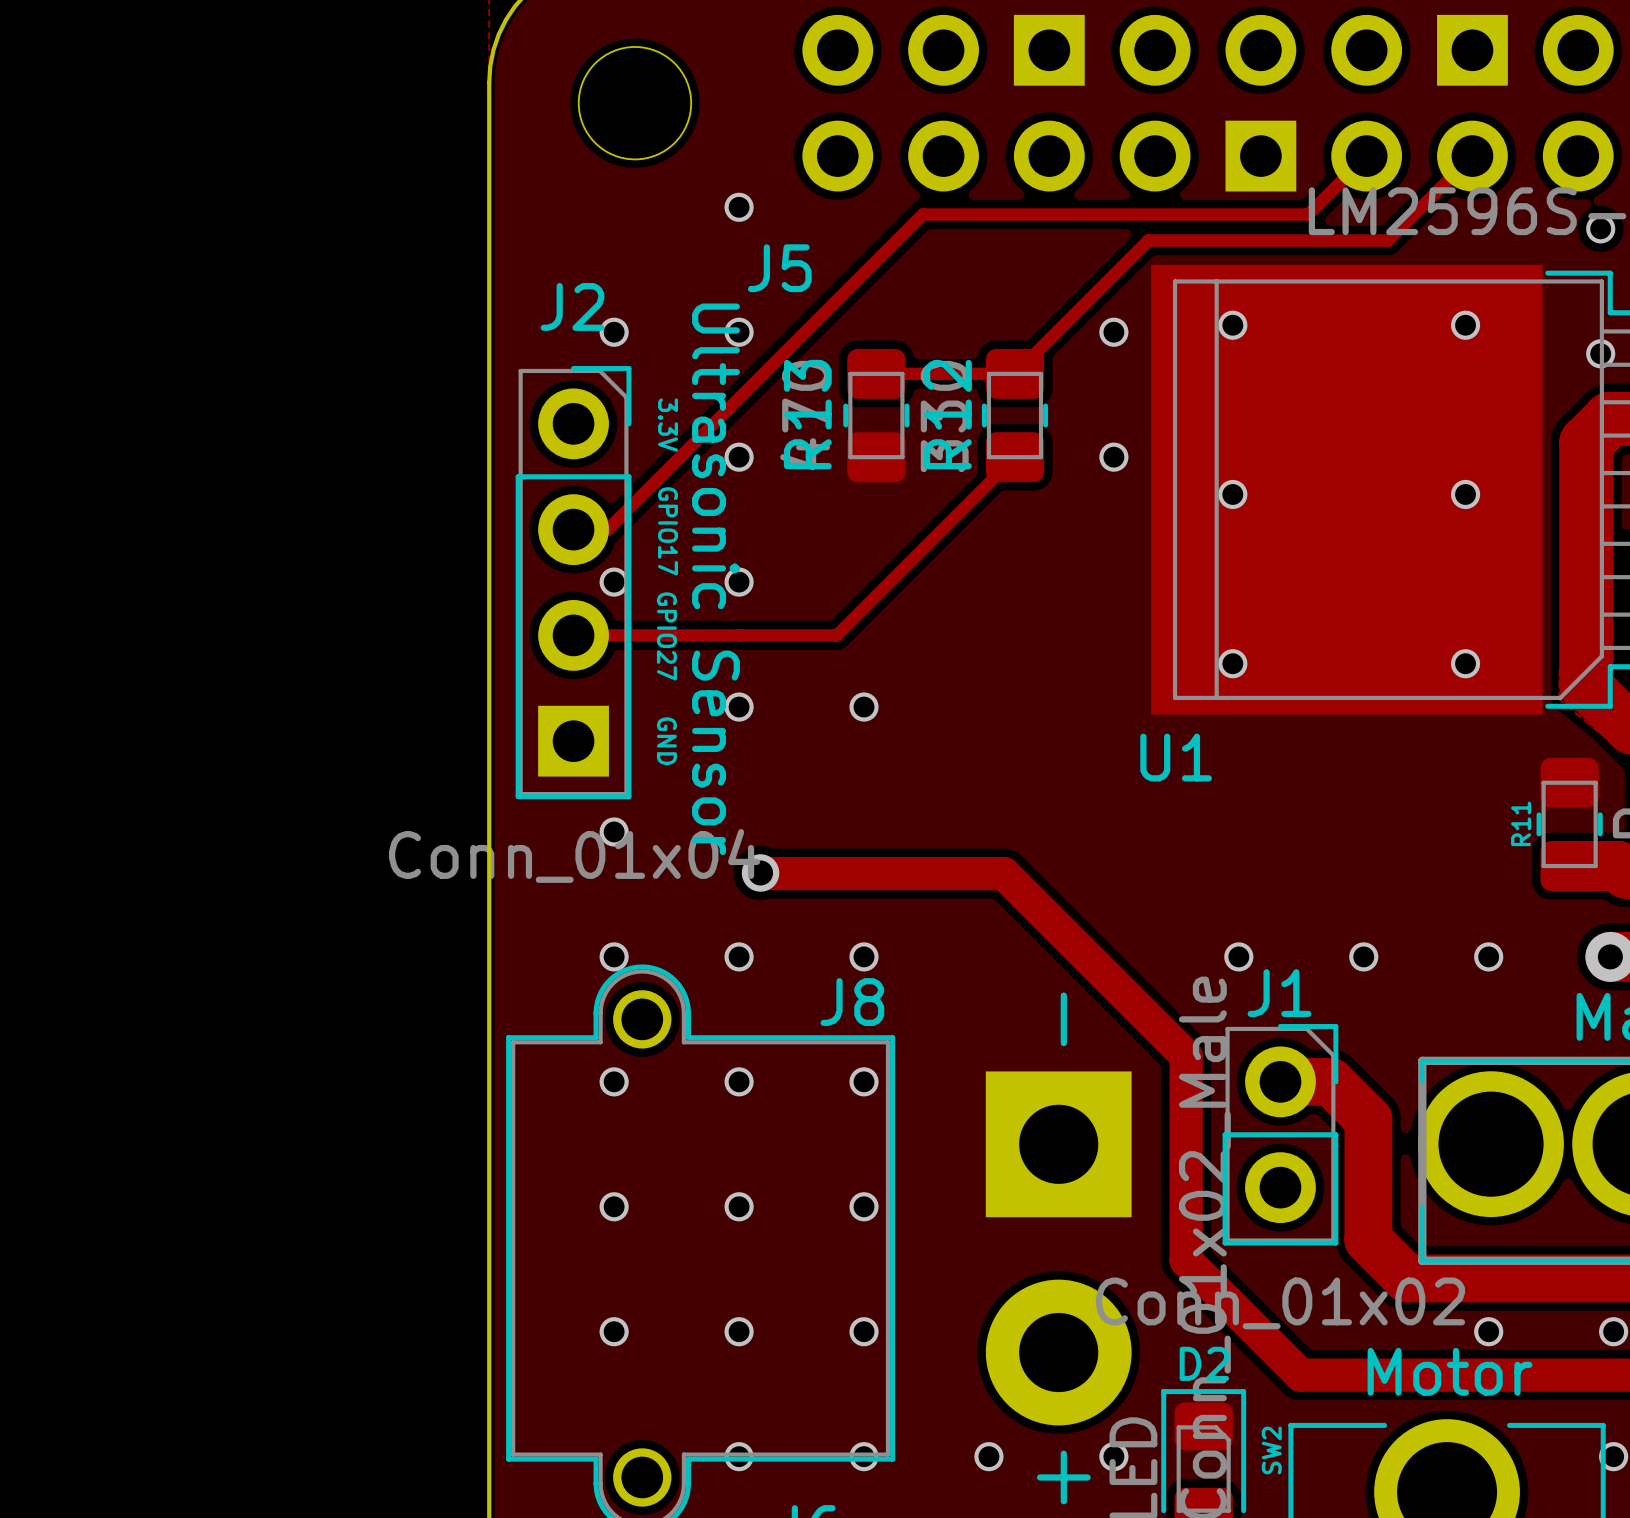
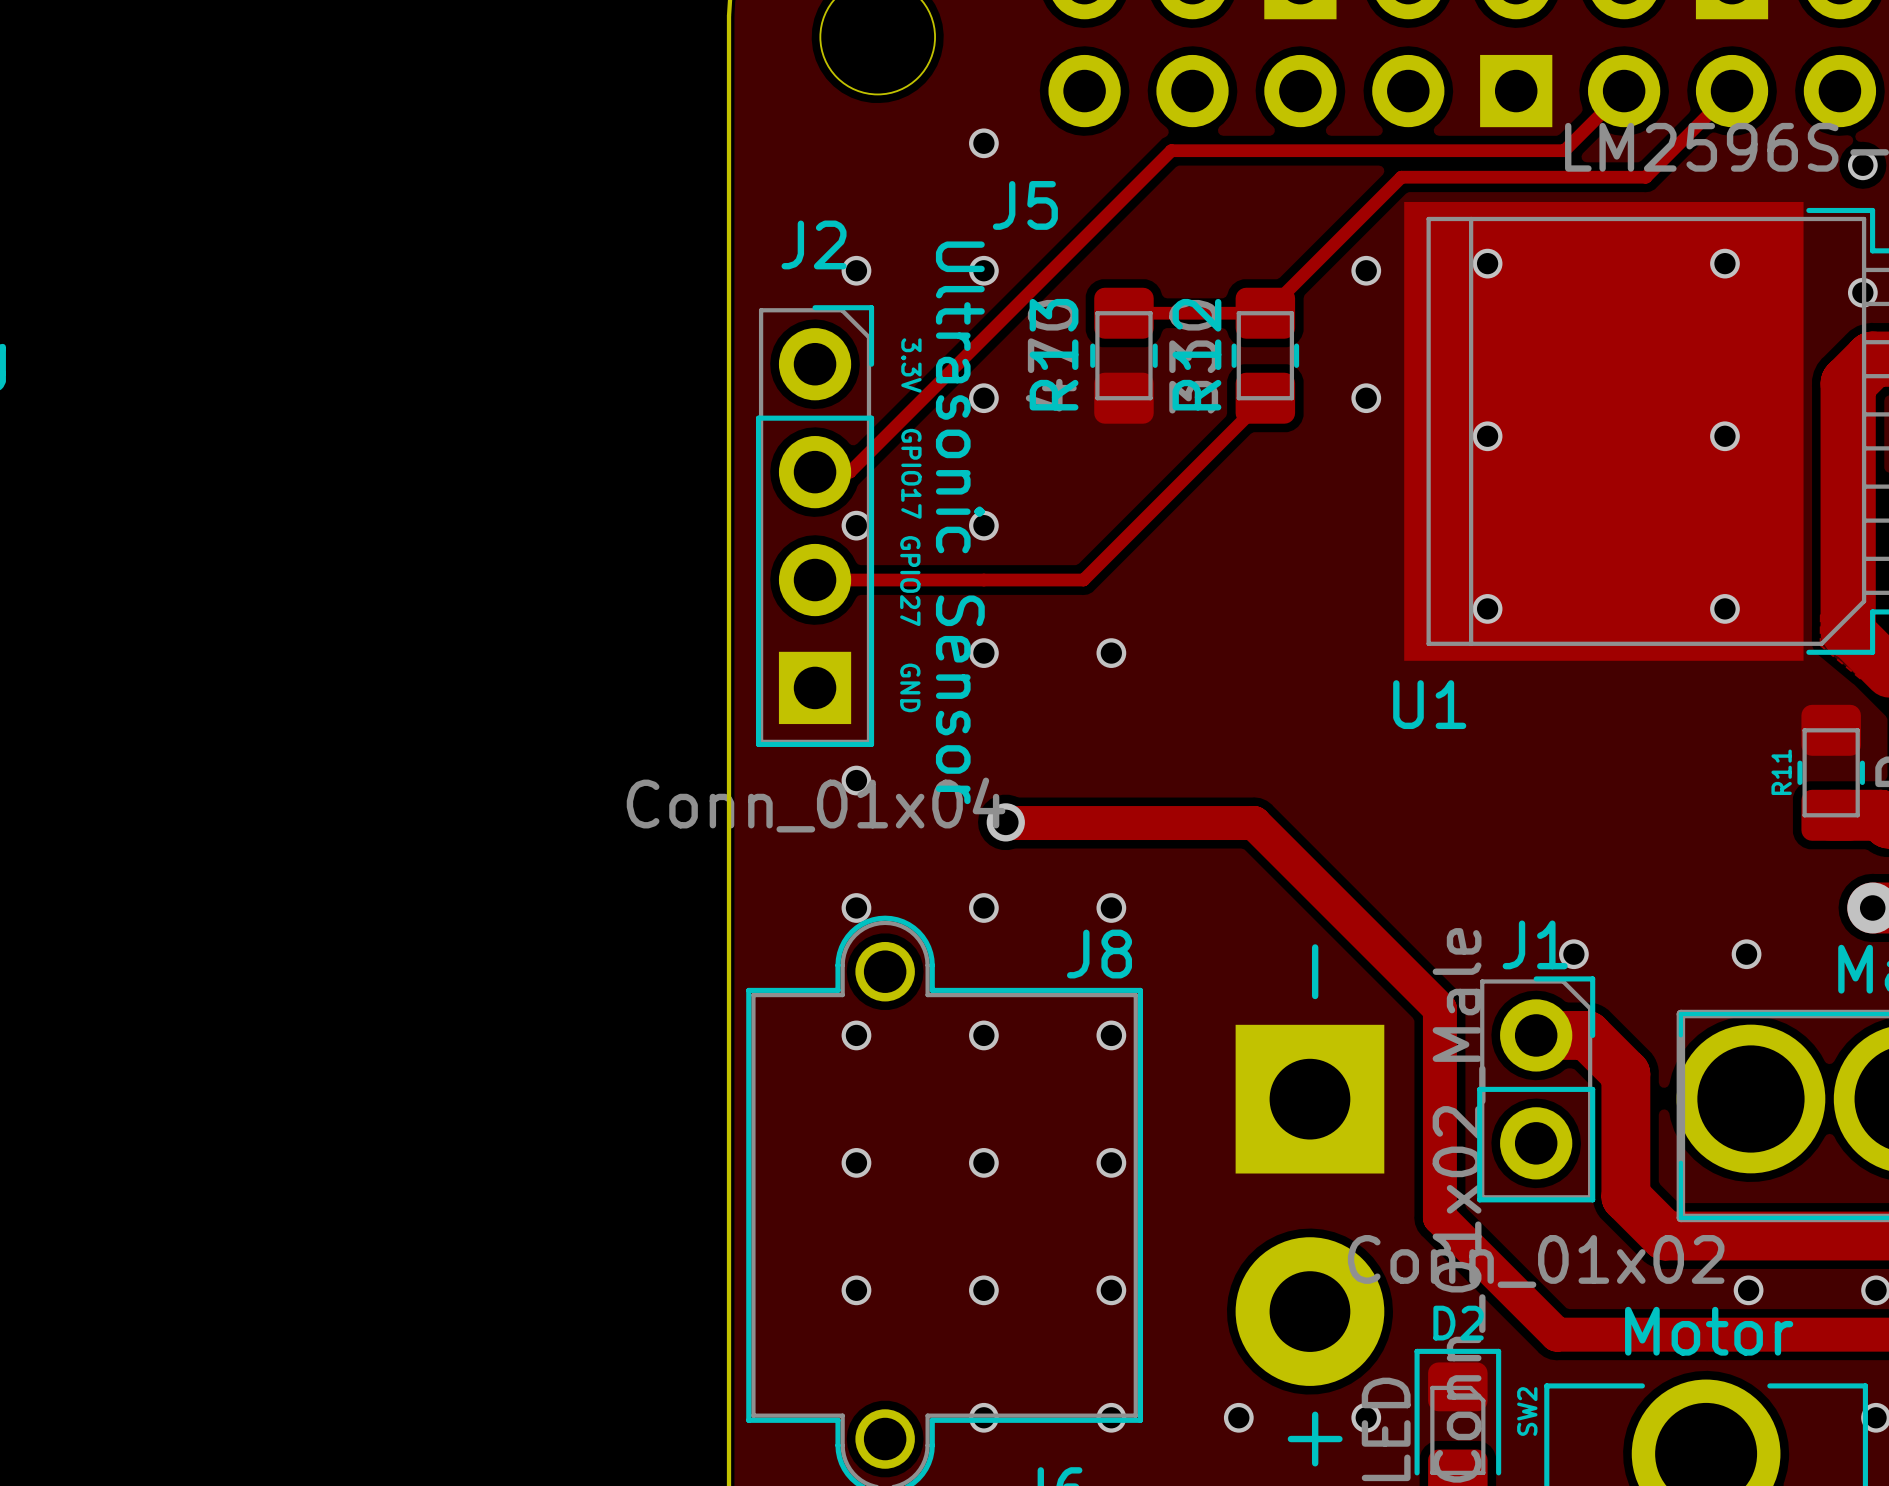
via: (1238, 956) -> none
via: (1363, 956) -> none
via position: (1488, 956) -> (1746, 954)
via: none -> (1573, 954)

